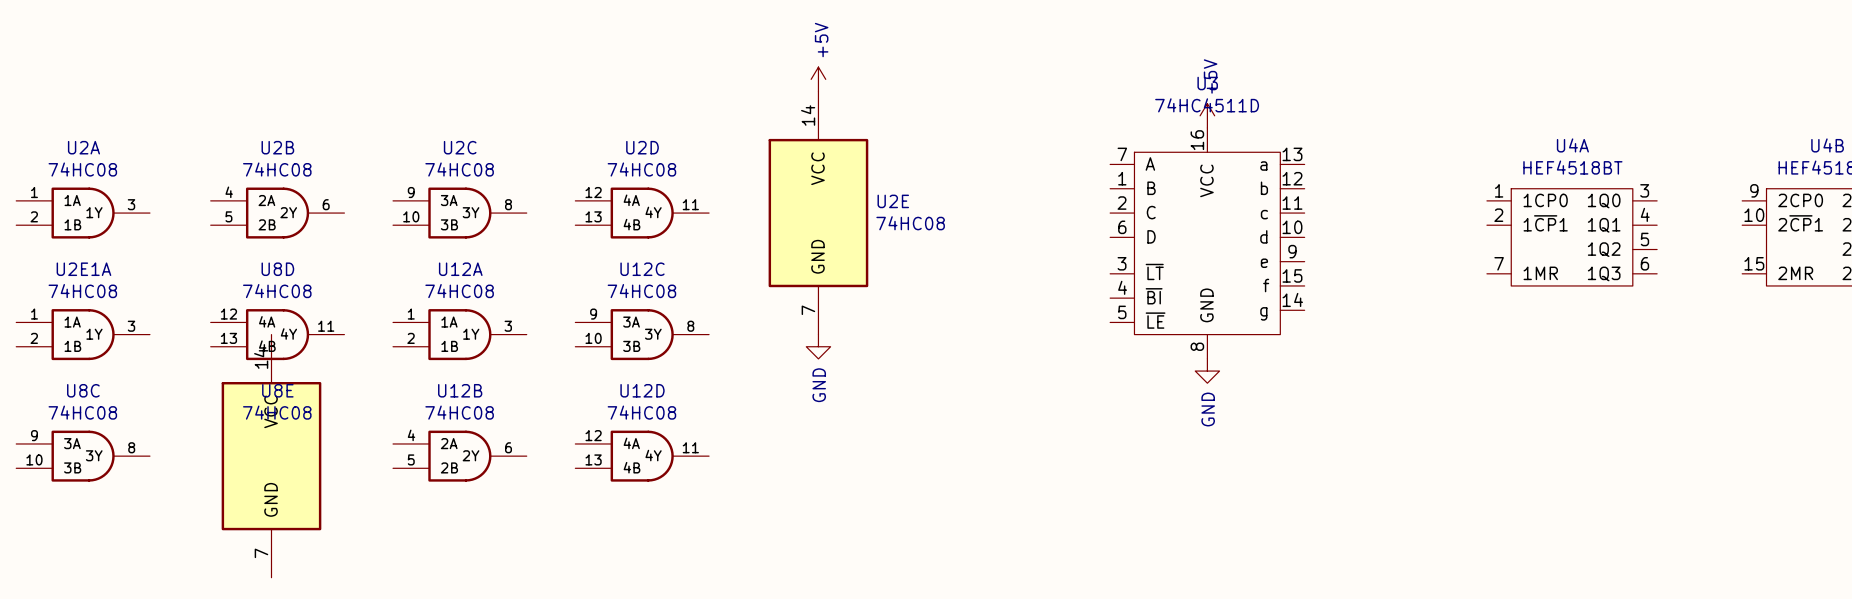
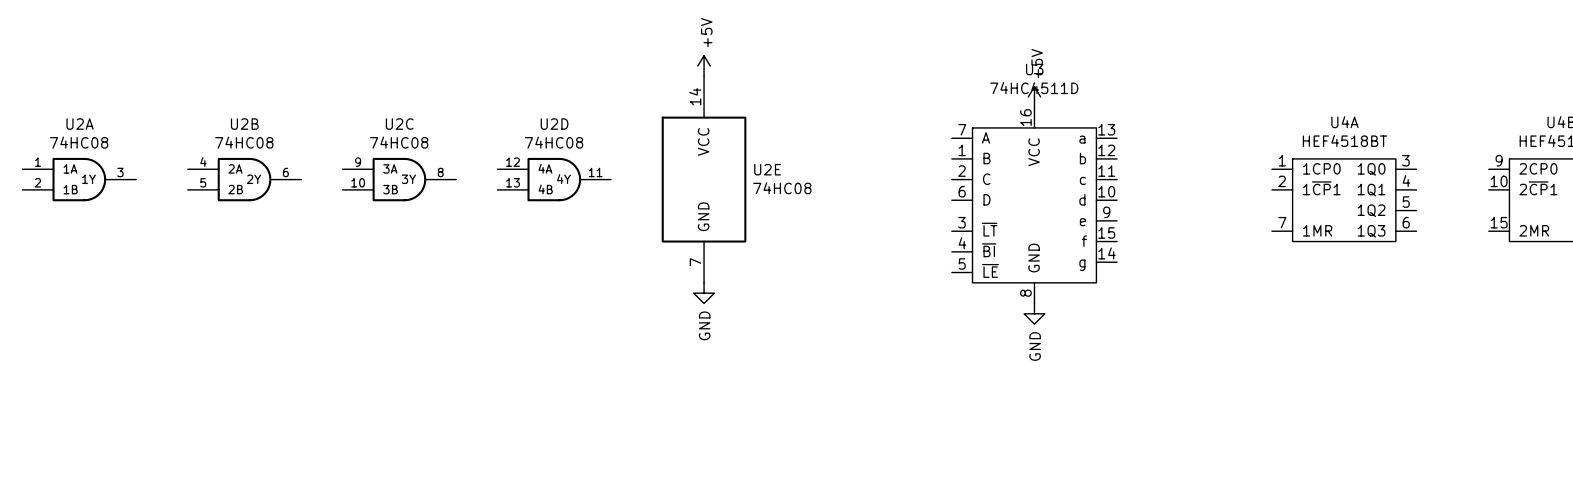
U2E1A: 74HC08 (83, 334) -> none
U8D: 74HC08 (277, 334) -> none
U12A: 74HC08 (459, 334) -> none
U12C: 74HC08 (642, 334) -> none
U8C: 74HC08 (83, 456) -> none
U8E: 74HC08 (271, 456) -> none
U12B: 74HC08 (459, 456) -> none
U12D: 74HC08 (642, 456) -> none

